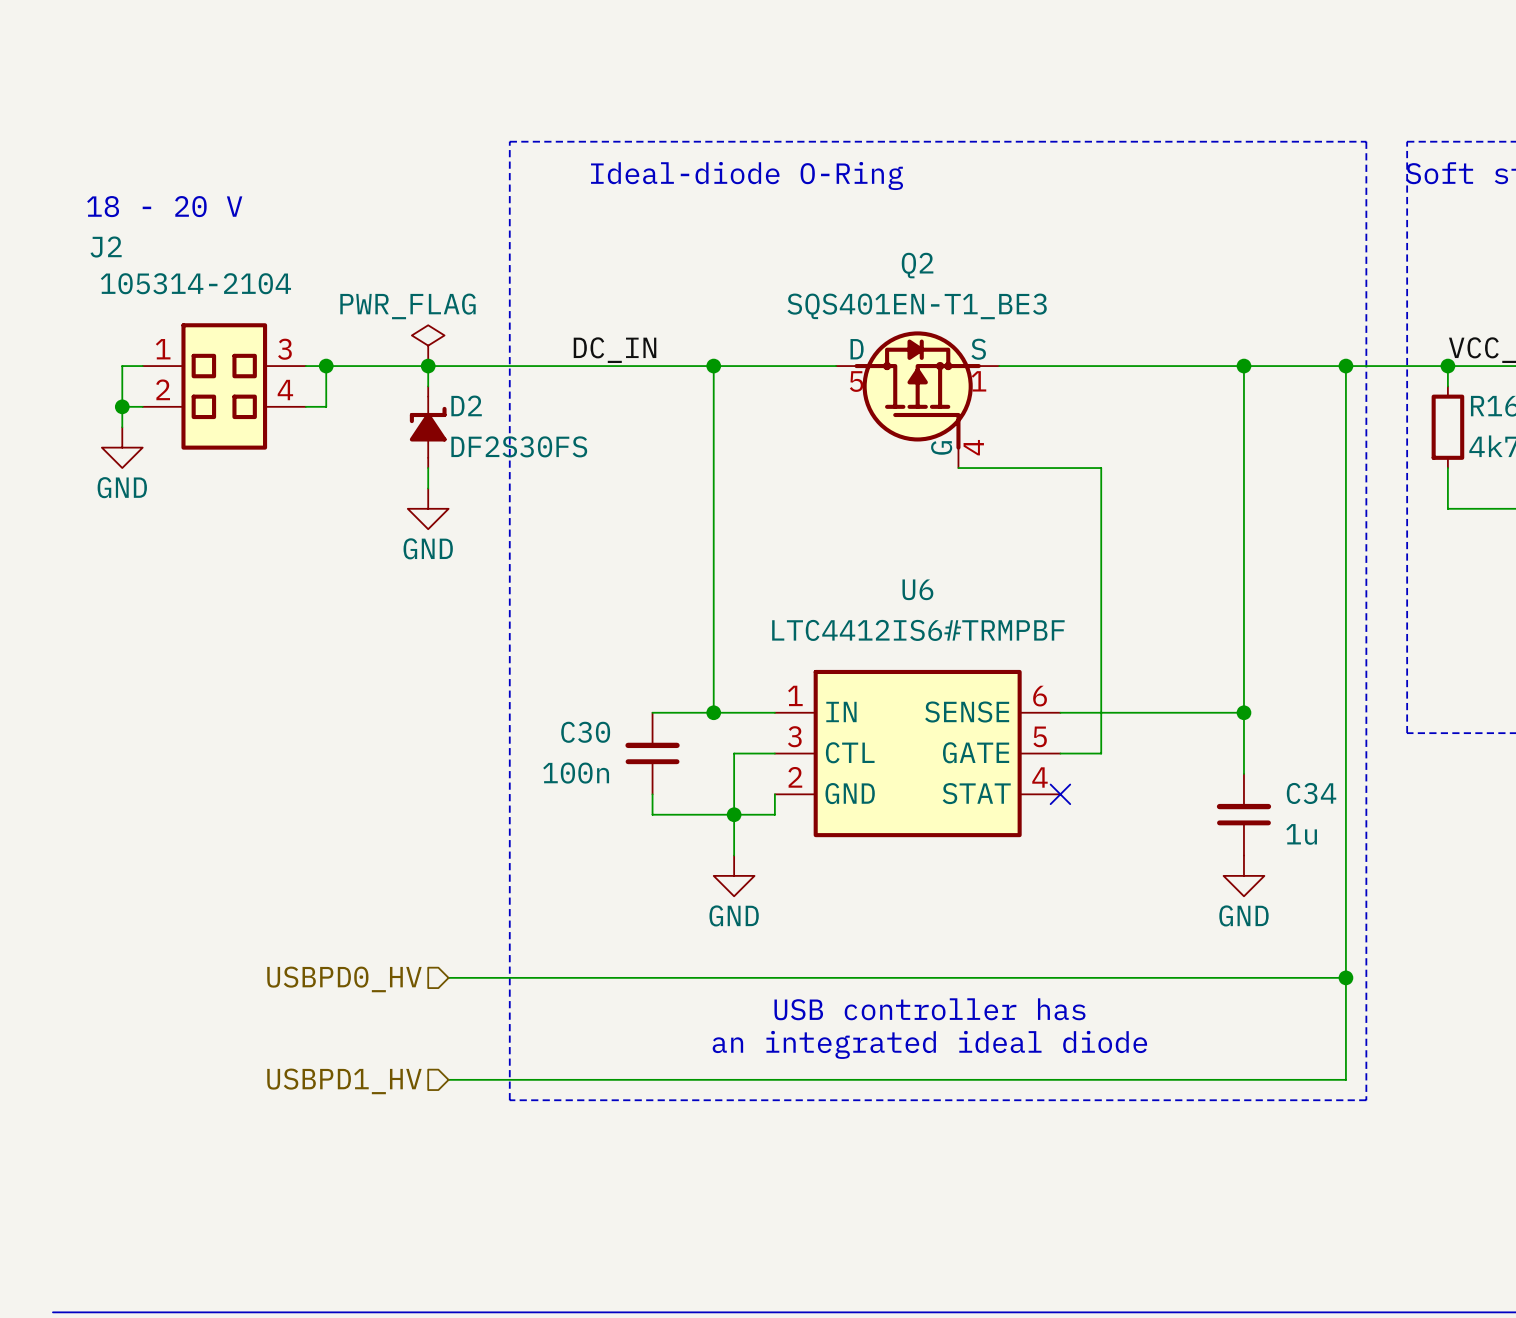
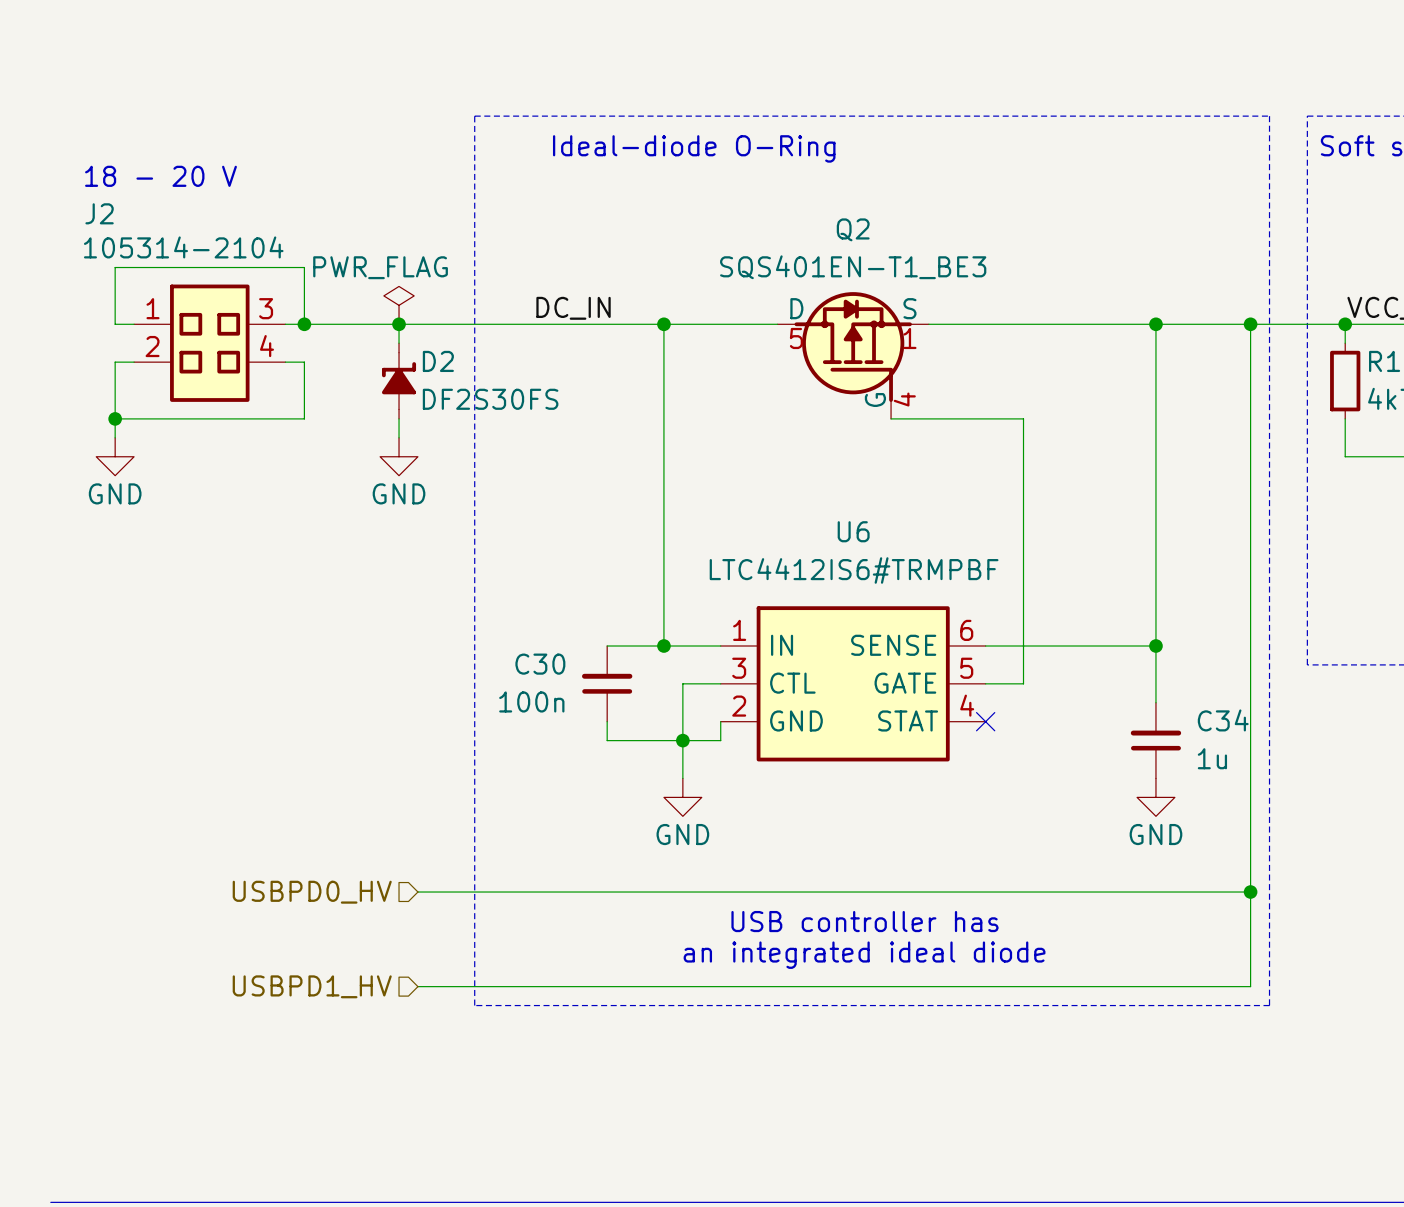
wire: (122, 366) (122, 406) -> (115, 324) (115, 267) (304, 267) (304, 324)
wire: (326, 366) (326, 406) -> (115, 418) (304, 418) (304, 362)
junction position: (122, 406) -> (115, 418)
wire: none -> (115, 381) (115, 437)
power symbol position: GND (122, 447) -> GND (115, 456)

